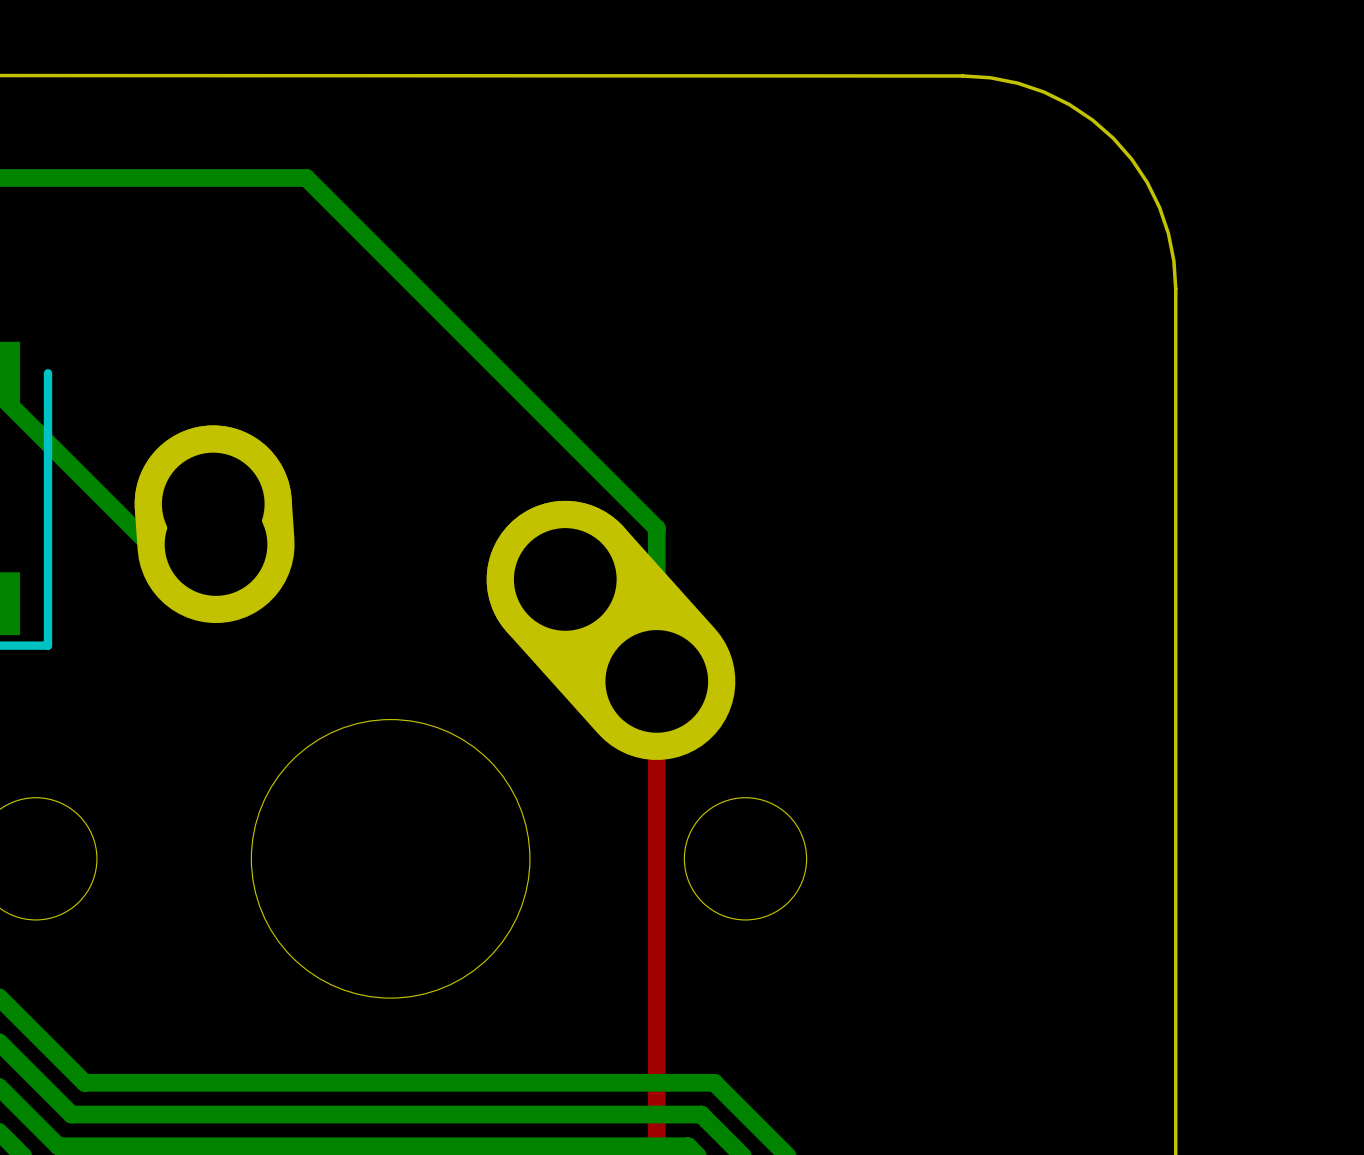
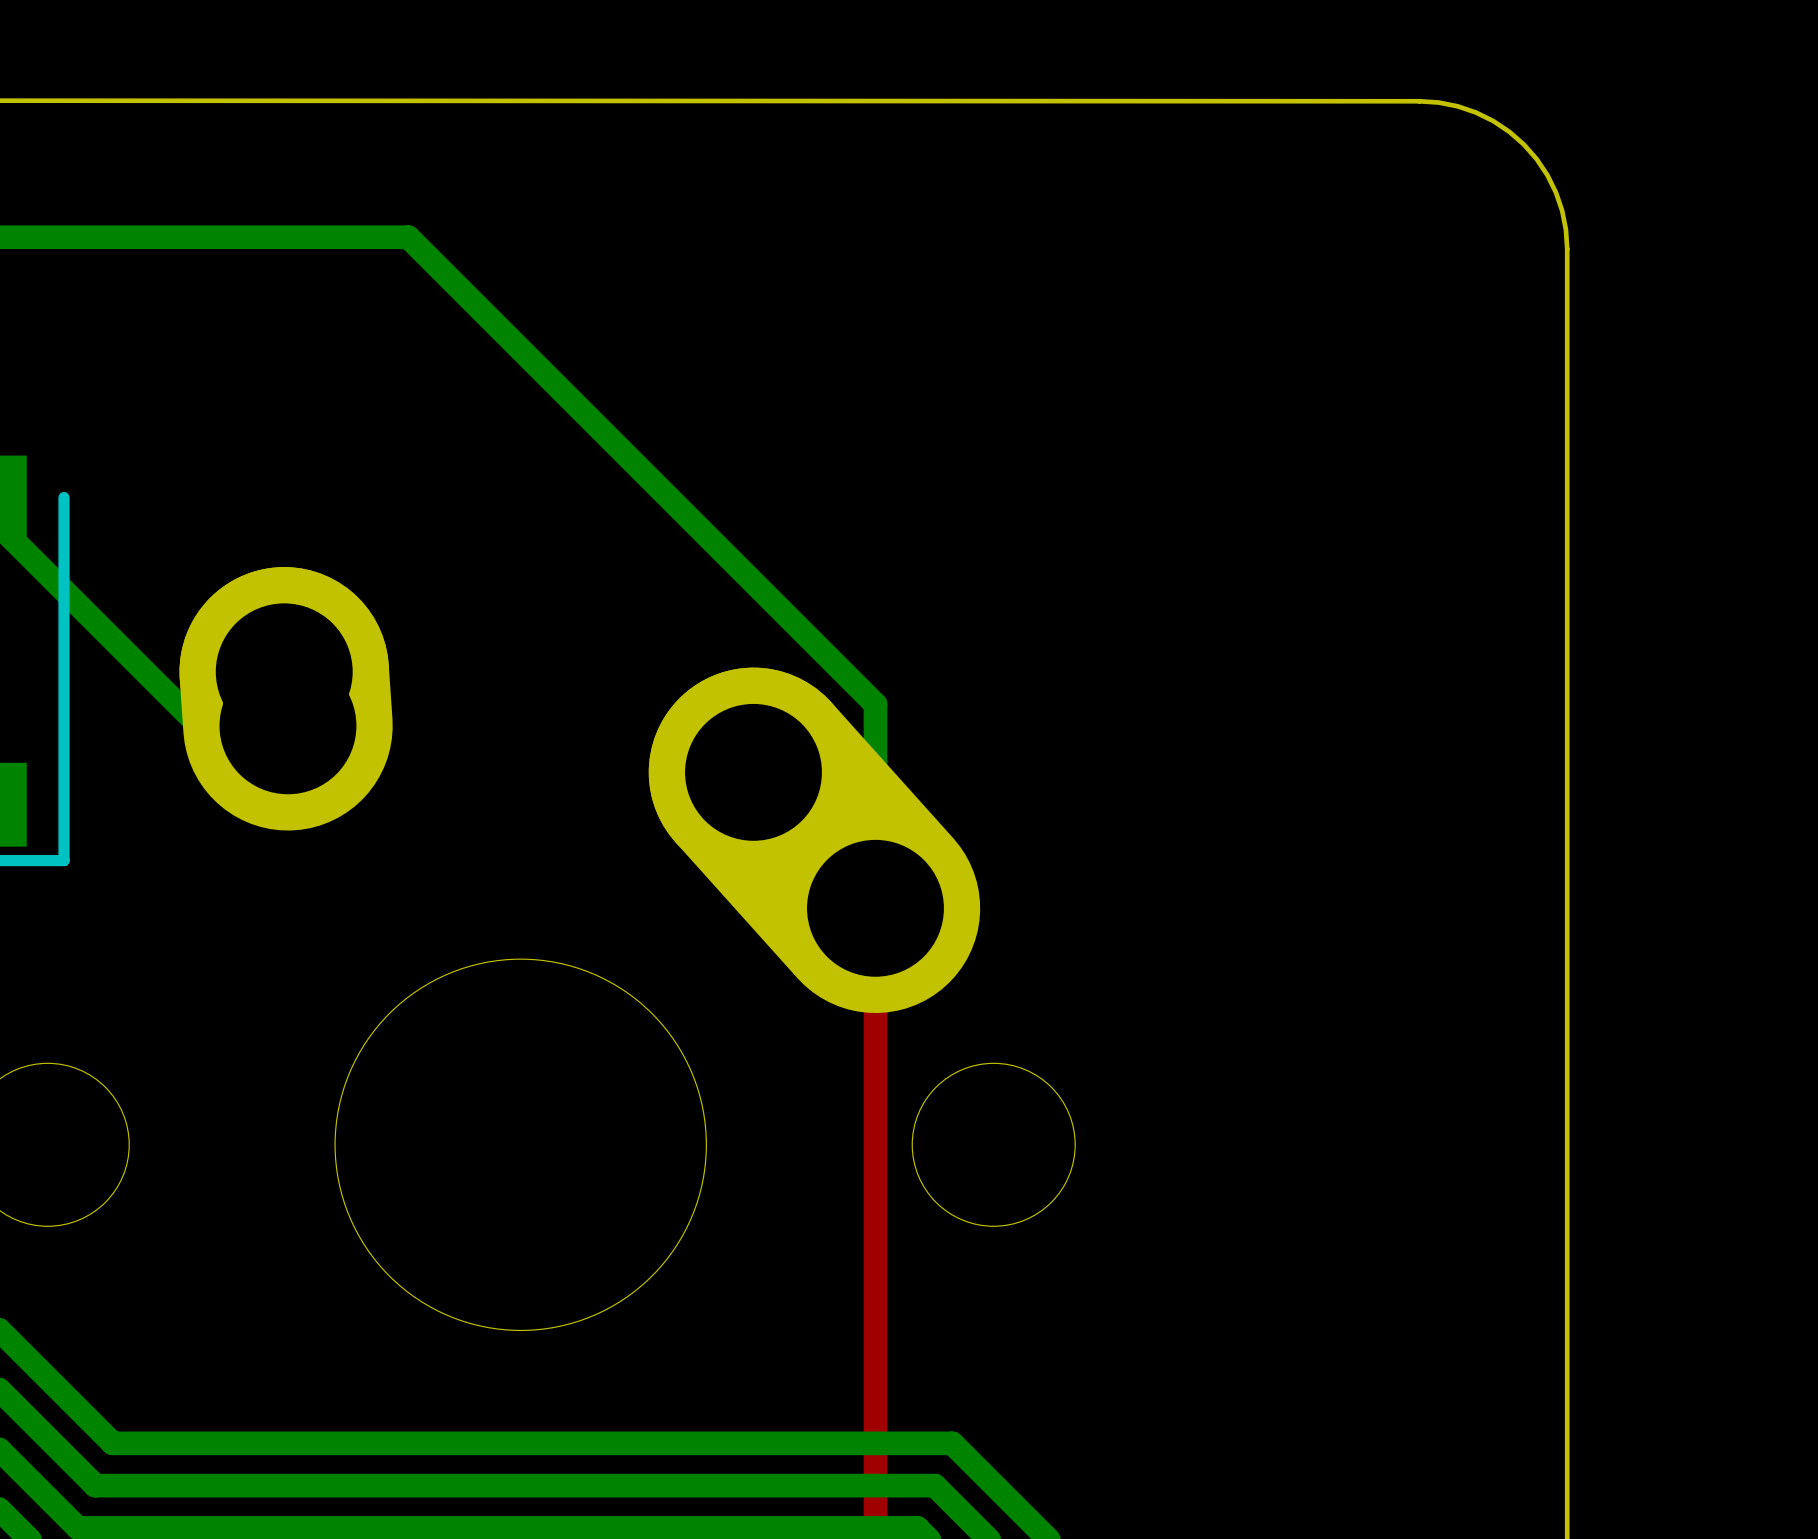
board edge: (962, 75) (990, 77) (1017, 83) (1044, 92) (1069, 104) (1092, 119) (1113, 138) (1131, 159) (1147, 182) (1159, 207) (1168, 233) (1173, 261) (1175, 288) -> (1283, 101) (1438, 102) (1475, 112) (1509, 131) (1523, 144) (1547, 175) (1555, 192) (1565, 229) (1567, 385)

